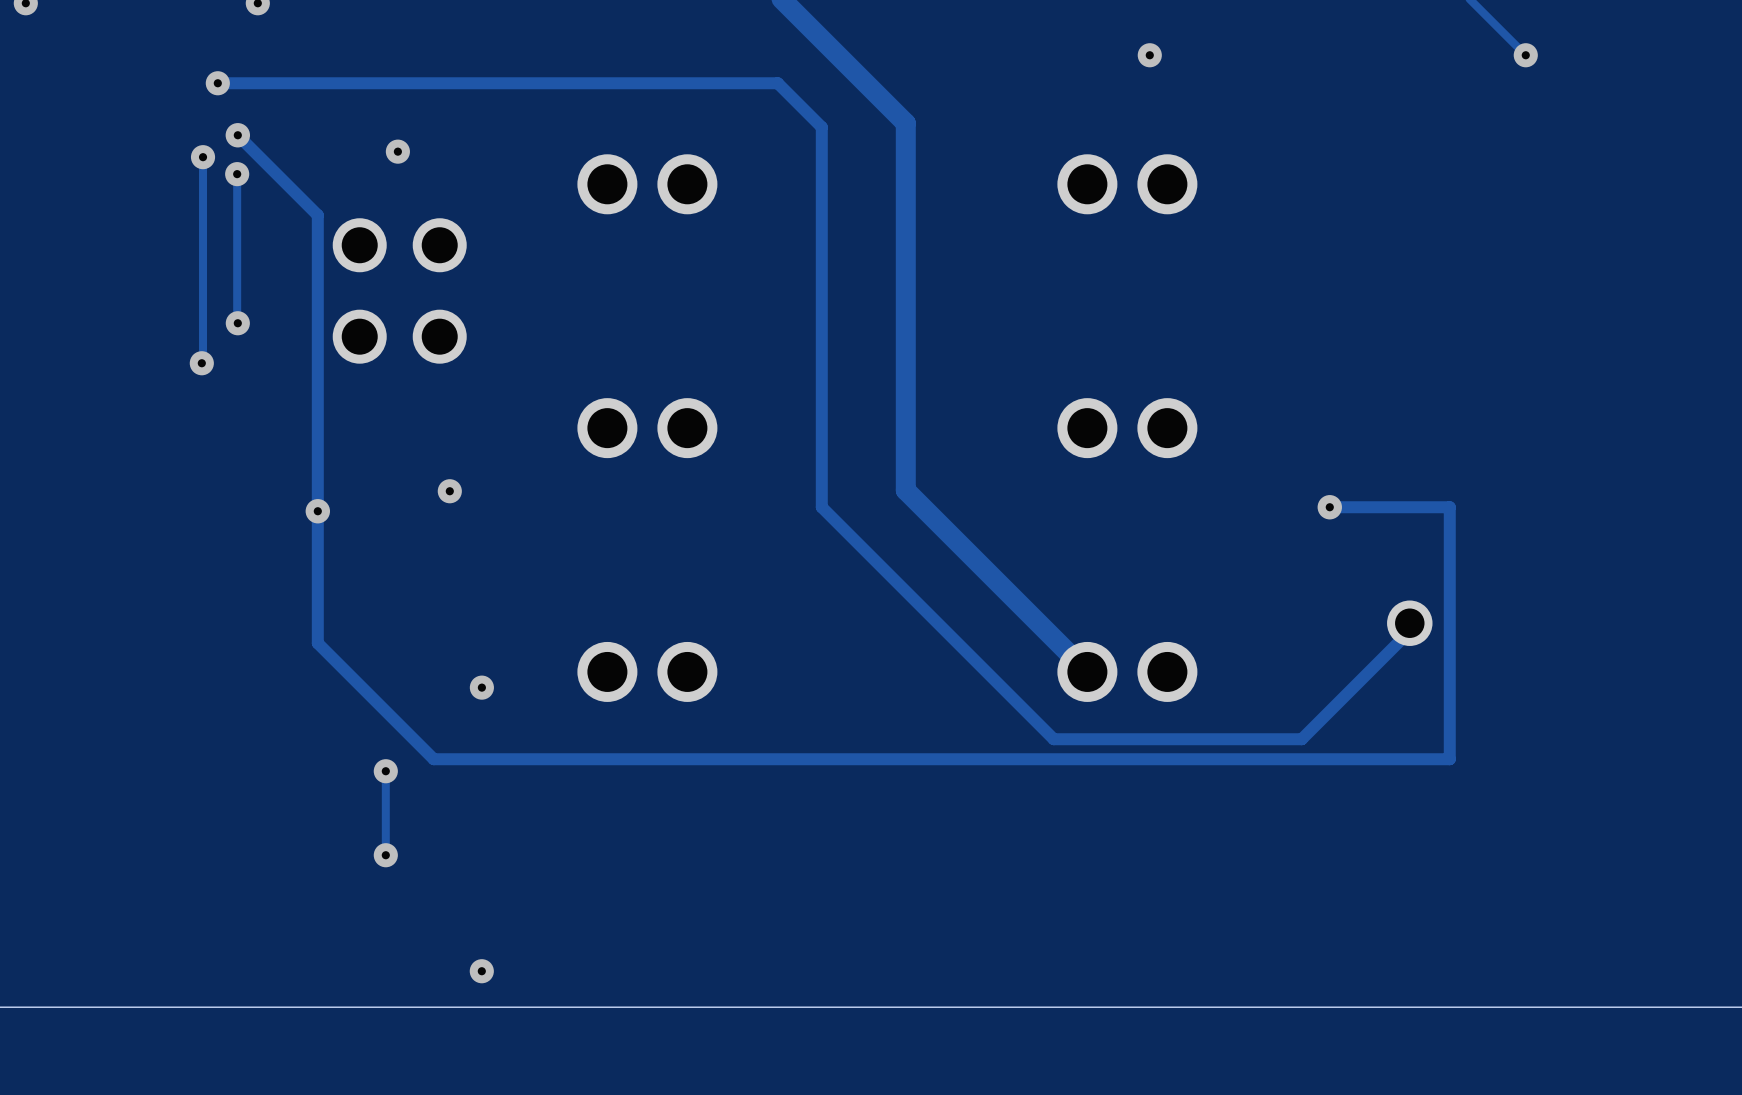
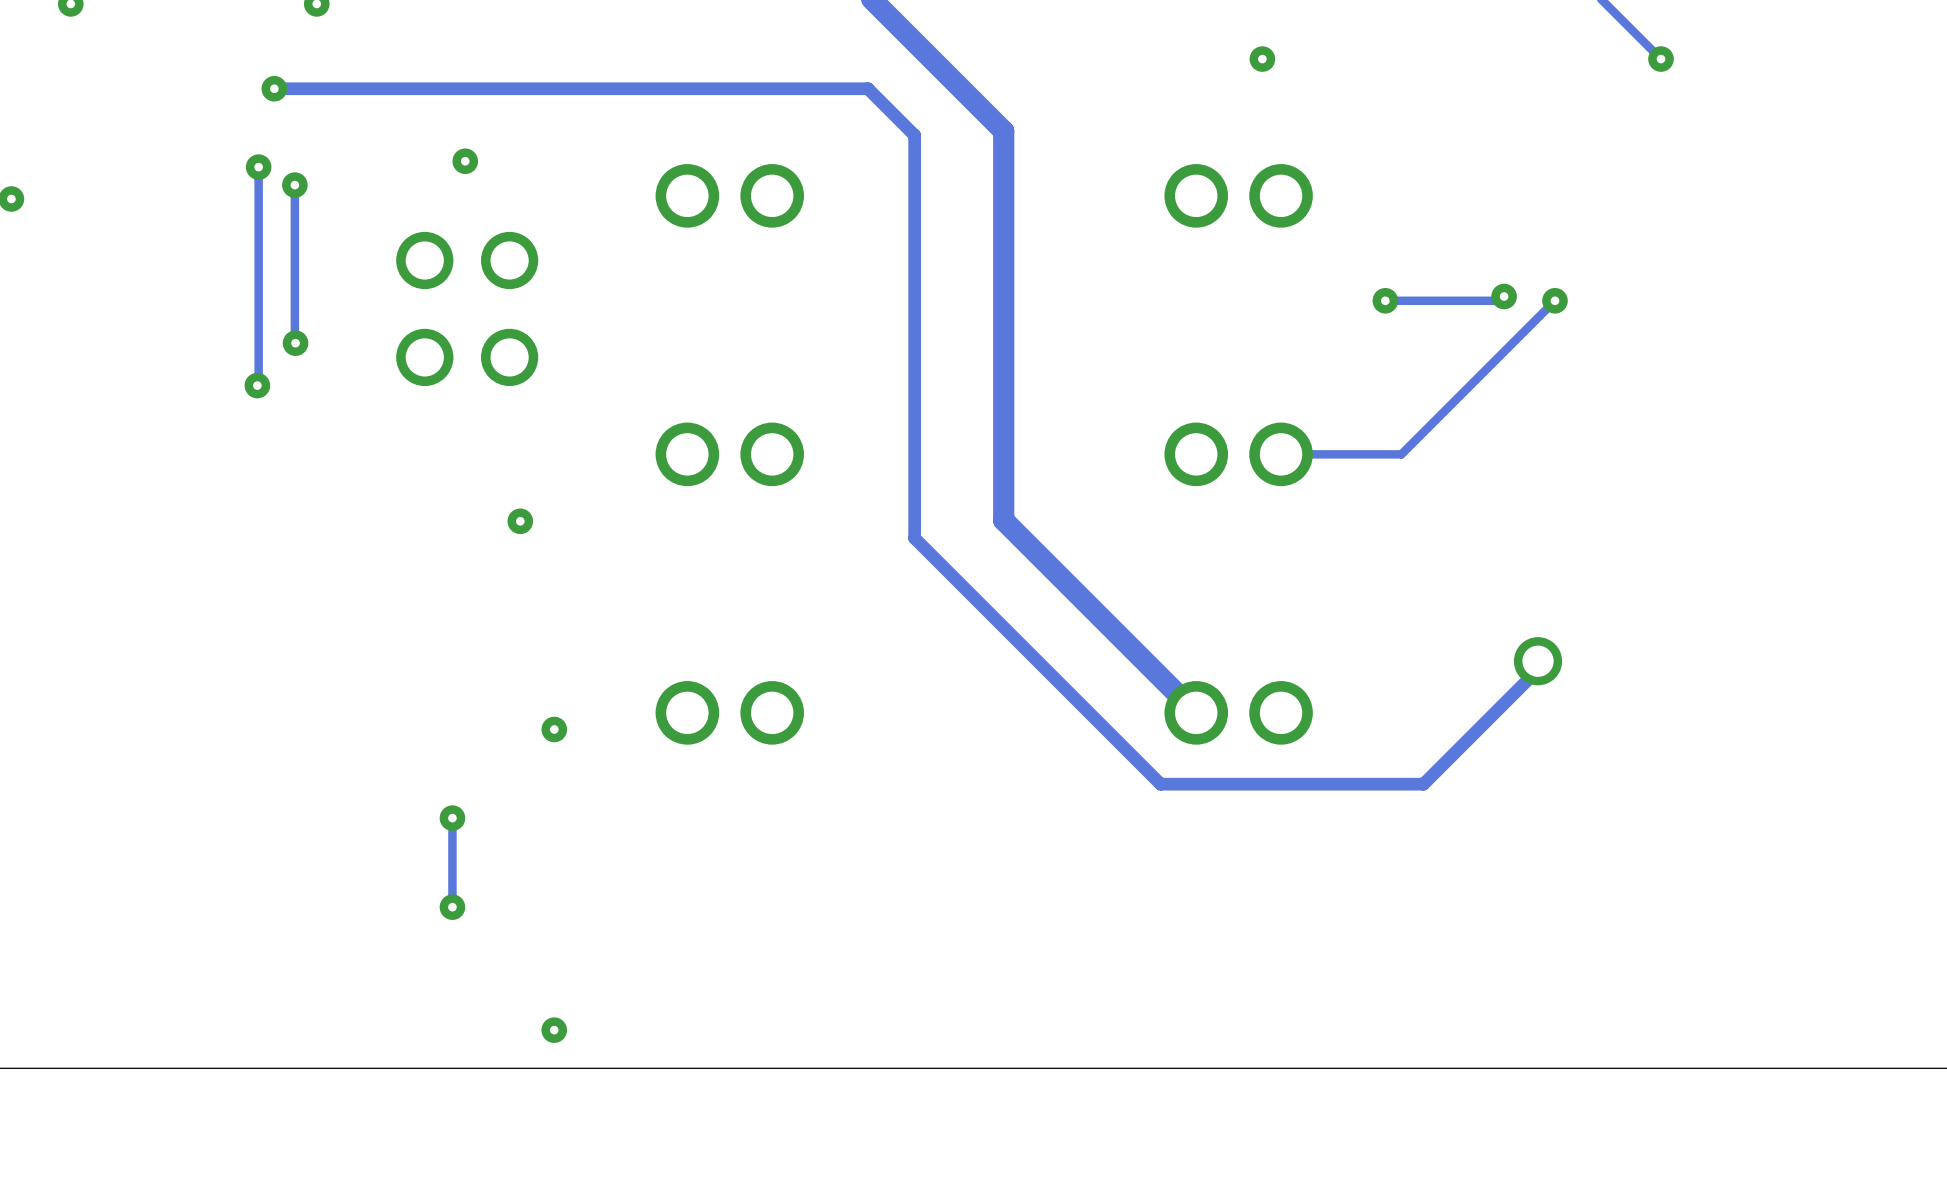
track: (237, 135) (317, 215) (317, 643) (433, 759) (1449, 759) (1449, 507) (1329, 507) -> none
via: (237, 135) -> none
track: none -> (1504, 296) (1499, 300) (1385, 300)
via: none -> (1504, 296)
via: none -> (1385, 300)
track: none -> (1554, 300) (1401, 454) (1281, 454)
via: none -> (1554, 300)
via: (1329, 507) -> none
via: (317, 511) -> none

